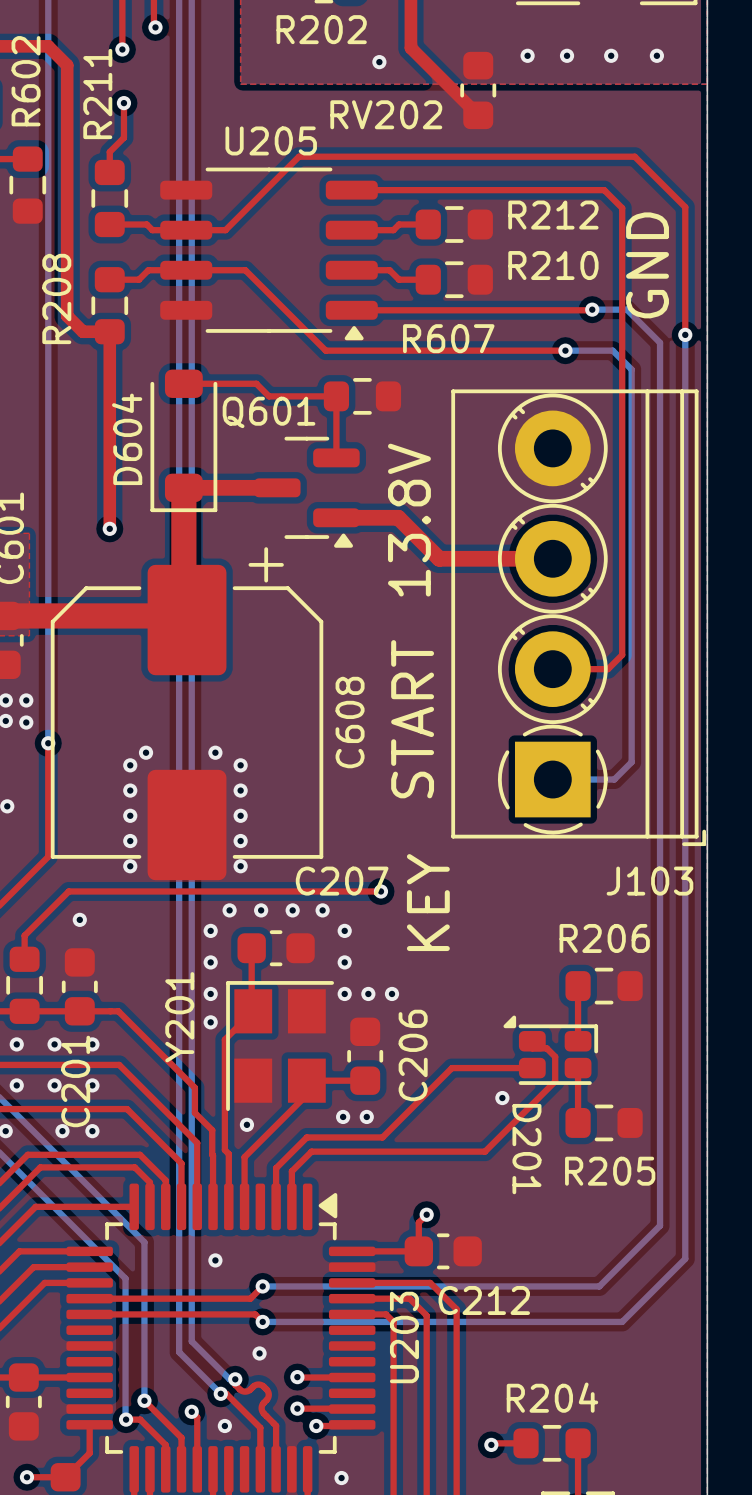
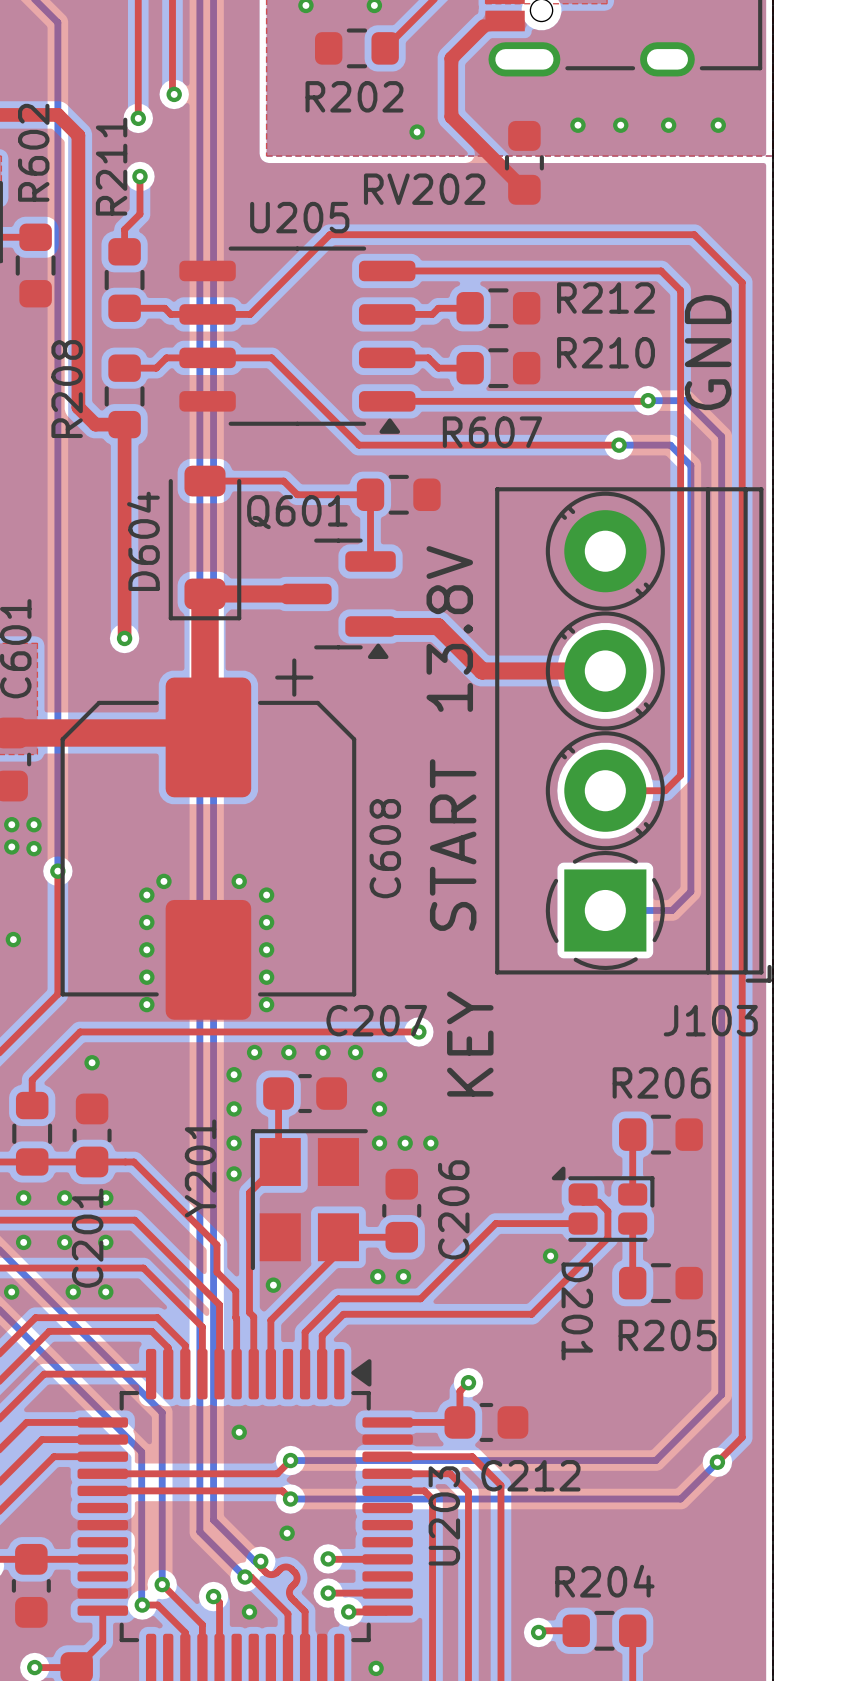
top track: (678, 200) (685, 207) (685, 334) -> (742, 282) (742, 1437) (717, 1462)
bottom track: (685, 334) (685, 1258) (656, 1288) -> none
via: (685, 334) -> none
via: none -> (717, 1462)

